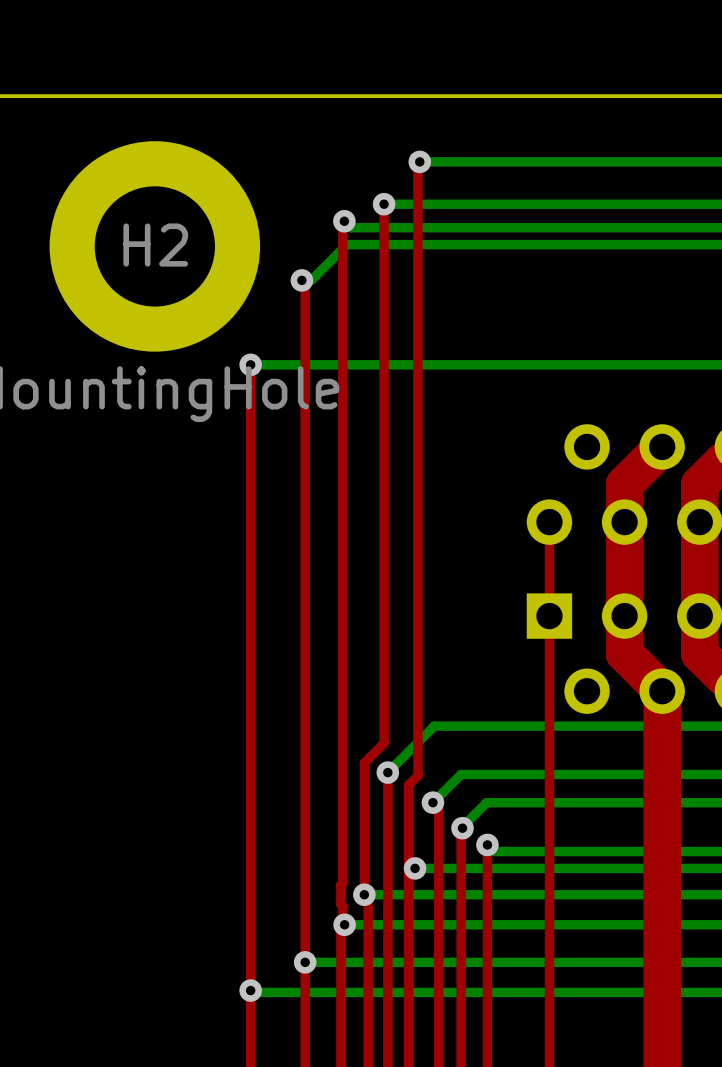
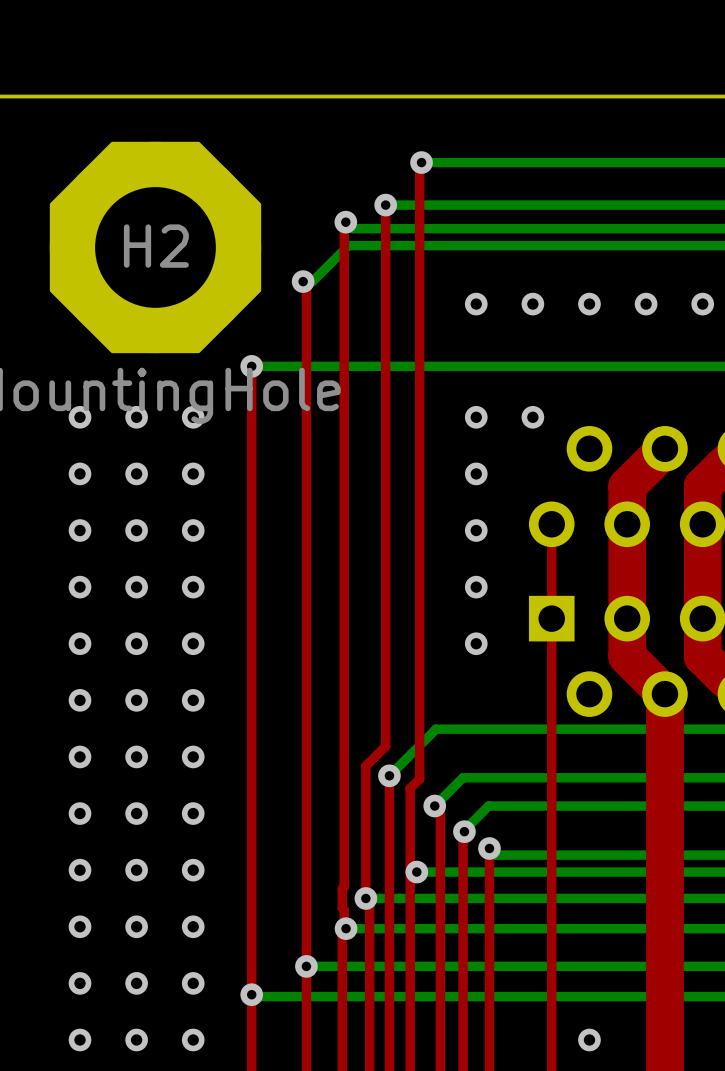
H2 footprint: [49, 141, 261, 352] -> [49, 141, 262, 354]
via: none -> (476, 304)
via: none -> (532, 304)
via: none -> (589, 304)
via: none -> (646, 304)
via: none -> (702, 304)
via: none -> (80, 417)
via: none -> (136, 417)
via: none -> (193, 417)
via: none -> (476, 417)
via: none -> (532, 417)
via: none -> (80, 473)
via: none -> (136, 473)
via: none -> (193, 473)
via: none -> (476, 473)
via: none -> (80, 530)
via: none -> (136, 530)
via: none -> (193, 530)
via: none -> (476, 530)
via: none -> (80, 587)
via: none -> (136, 587)
via: none -> (193, 587)
via: none -> (476, 587)
via: none -> (80, 643)
via: none -> (136, 643)
via: none -> (193, 643)
via: none -> (476, 643)
via: none -> (80, 700)
via: none -> (136, 700)
via: none -> (193, 700)
via: none -> (80, 756)
via: none -> (136, 756)
via: none -> (193, 756)
via: none -> (80, 813)
via: none -> (136, 813)
via: none -> (193, 813)
via: none -> (80, 870)
via: none -> (136, 870)
via: none -> (193, 870)
via: none -> (80, 926)
via: none -> (136, 926)
via: none -> (193, 926)
via: none -> (80, 983)
via: none -> (136, 983)
via: none -> (193, 983)
via: none -> (80, 1039)
via: none -> (136, 1039)
via: none -> (193, 1039)
via: none -> (589, 1039)

